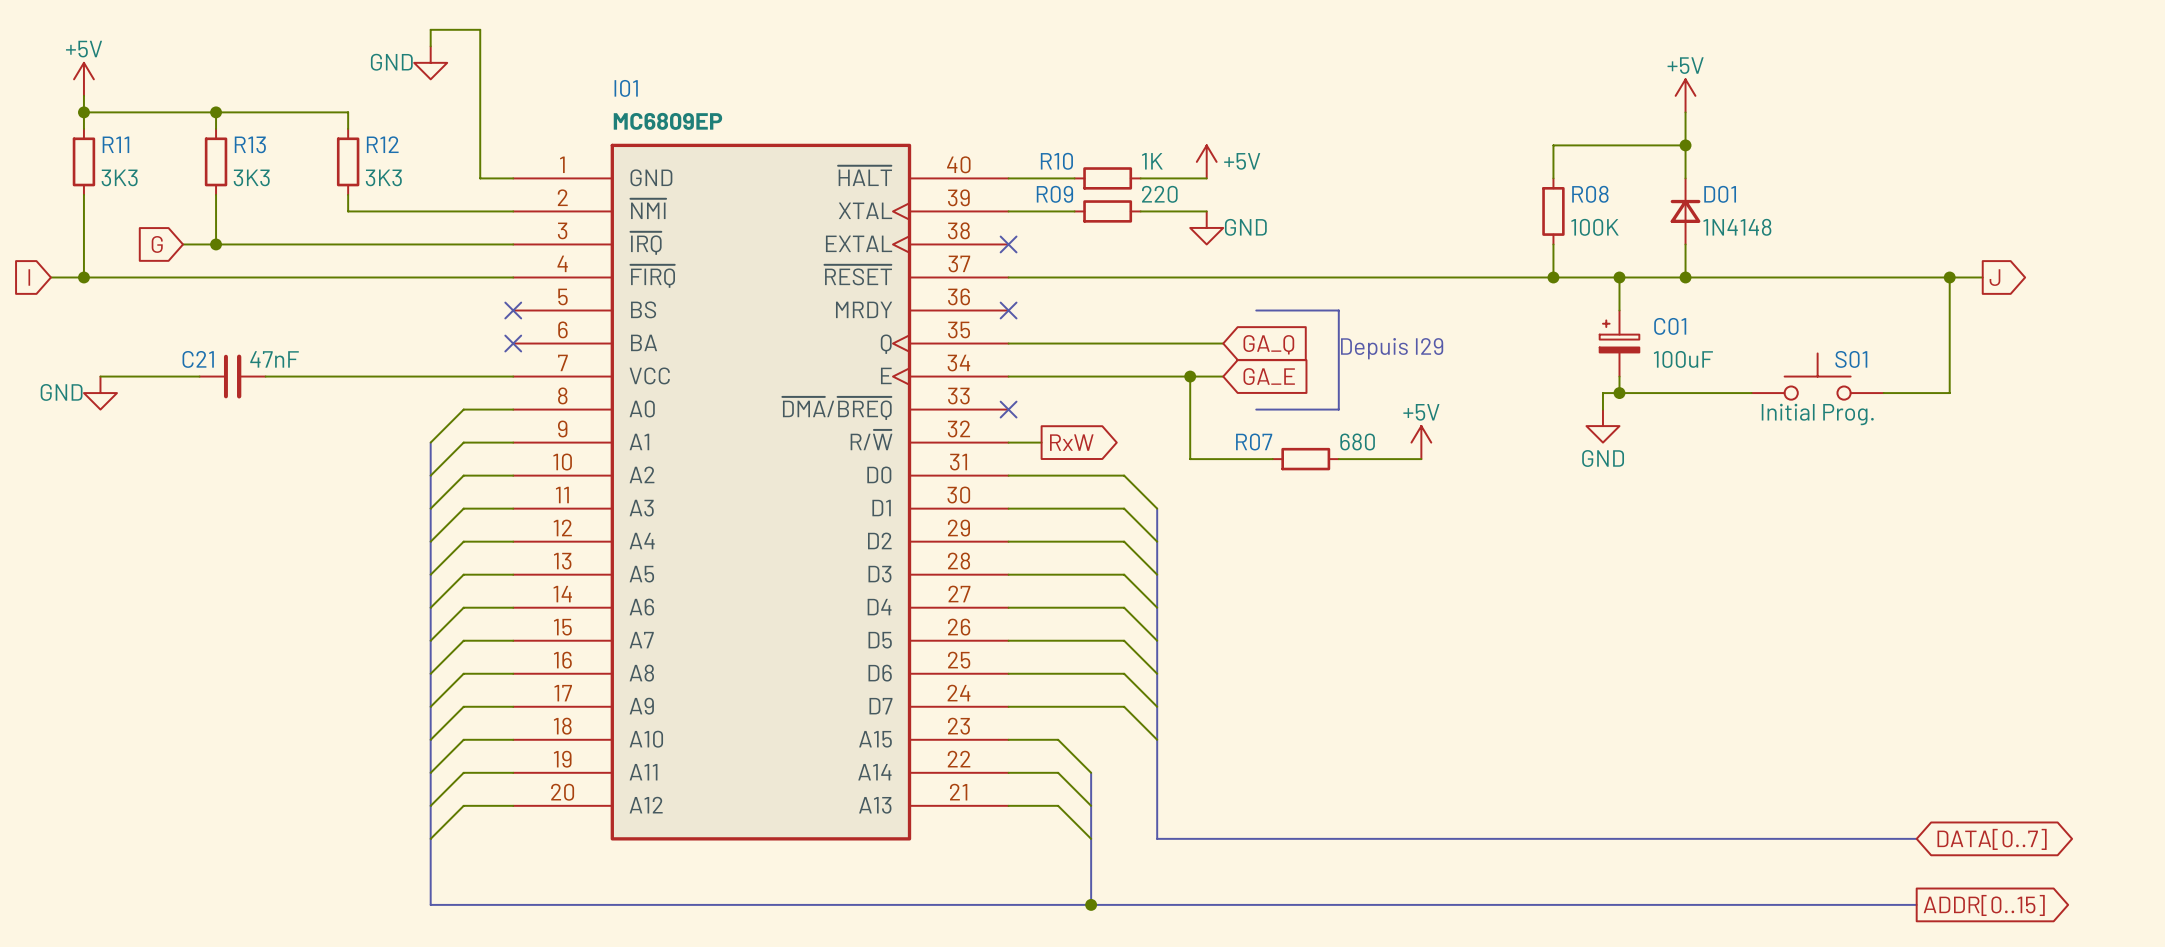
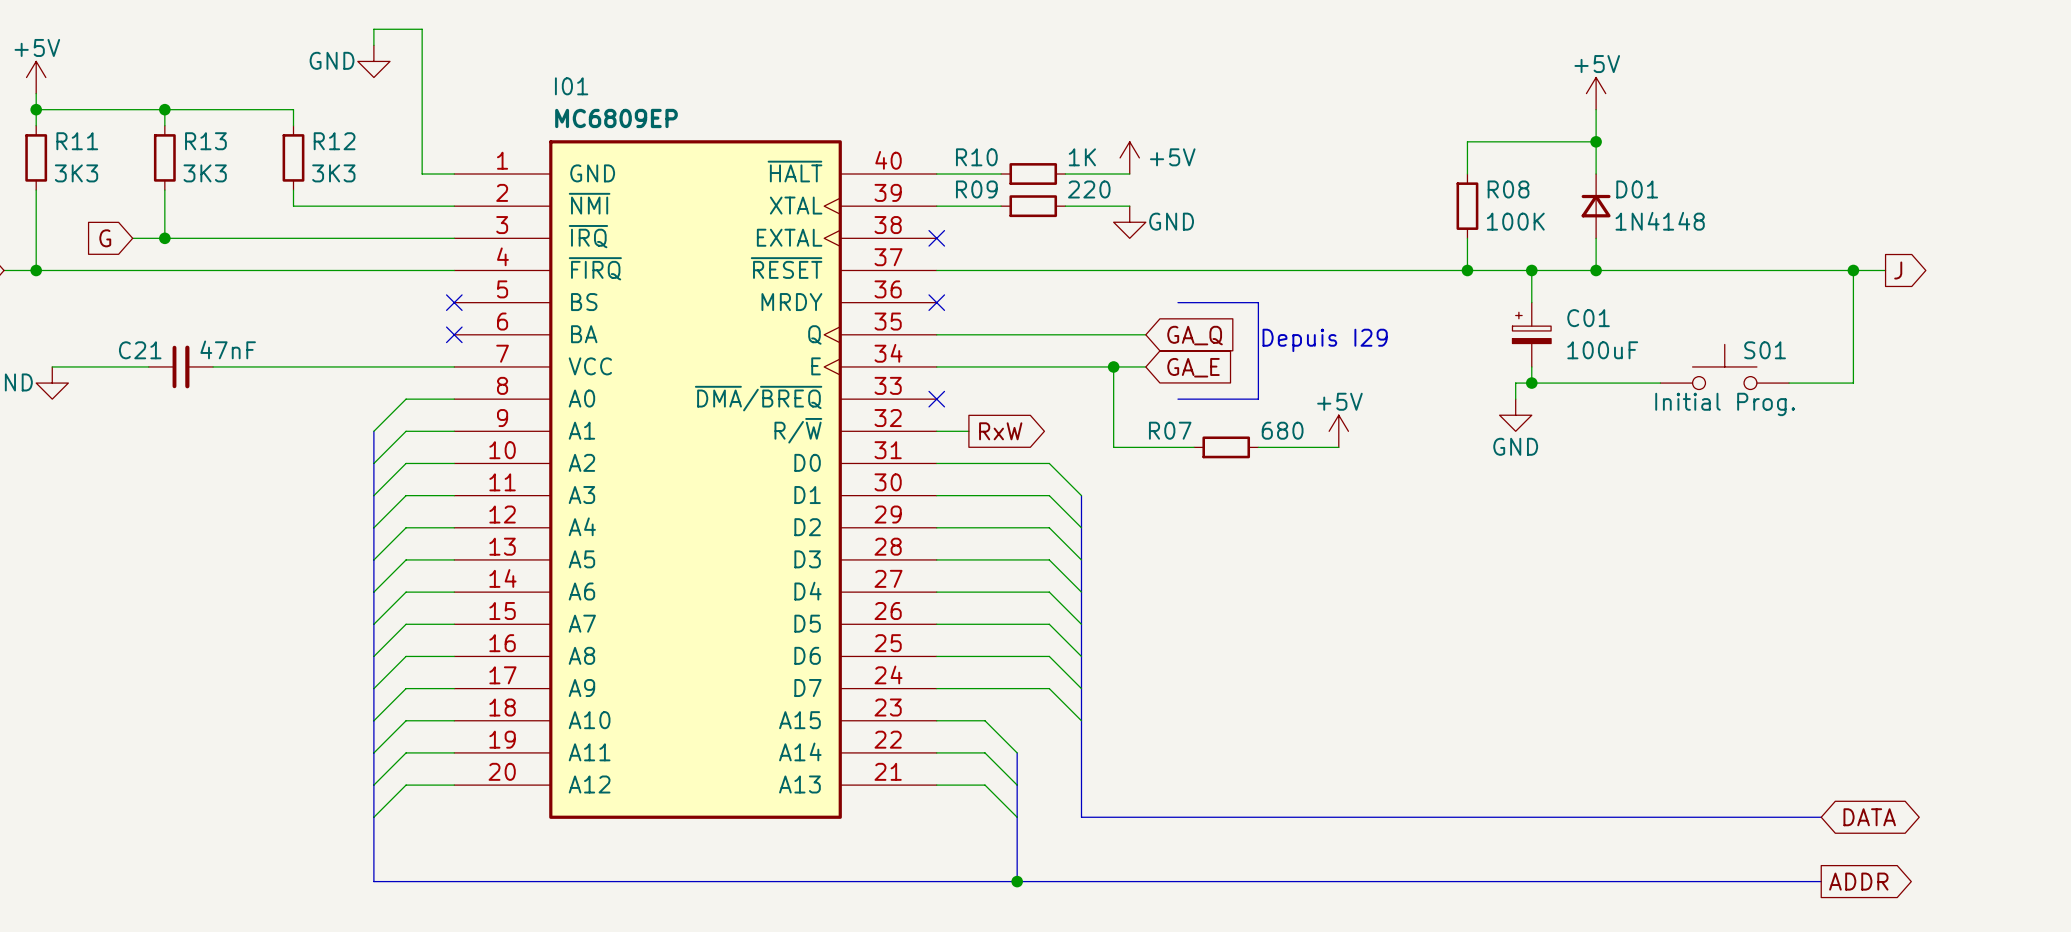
global label: DATA[0..7] (1992, 839) -> DATA (1869, 817)
global label: ADDR[0..15] (1984, 905) -> ADDR (1858, 881)

